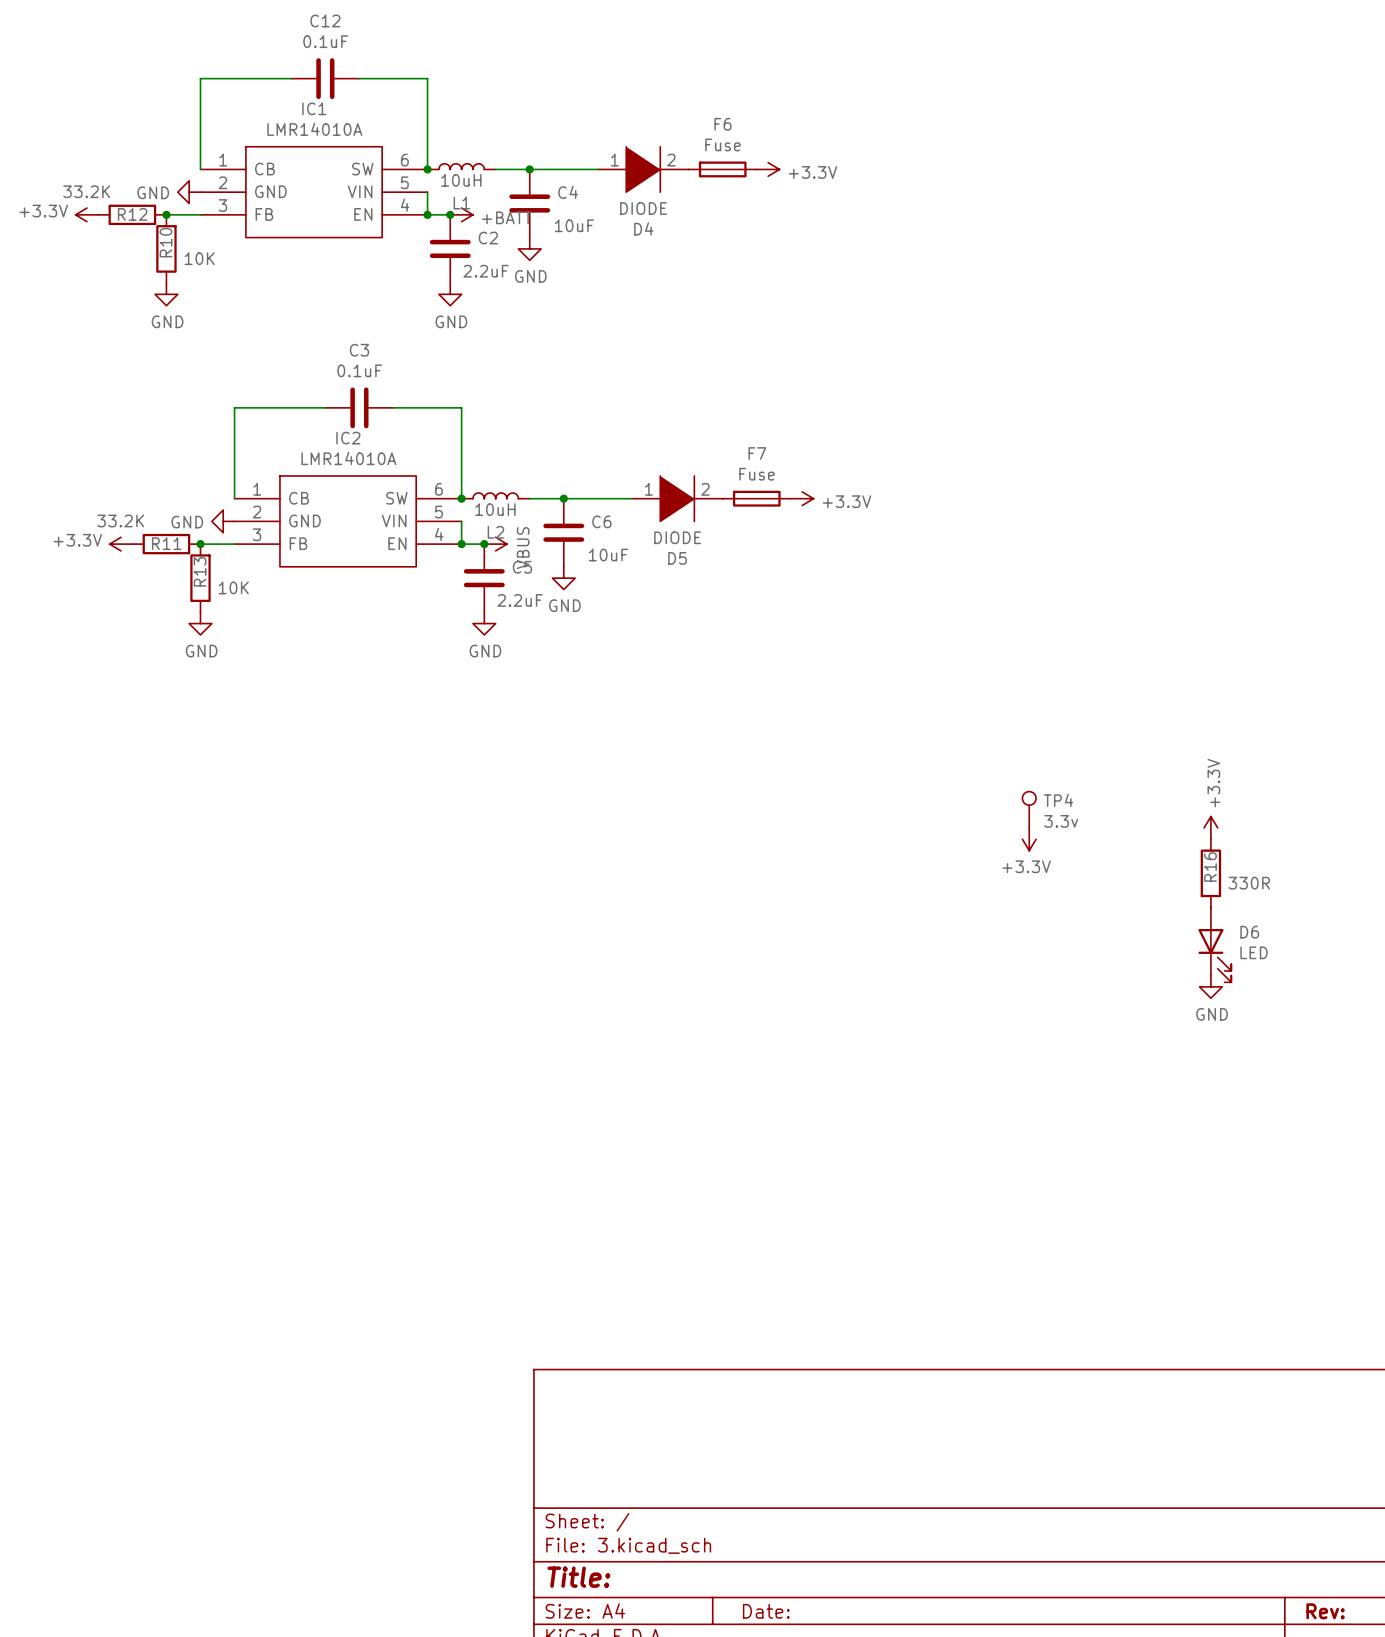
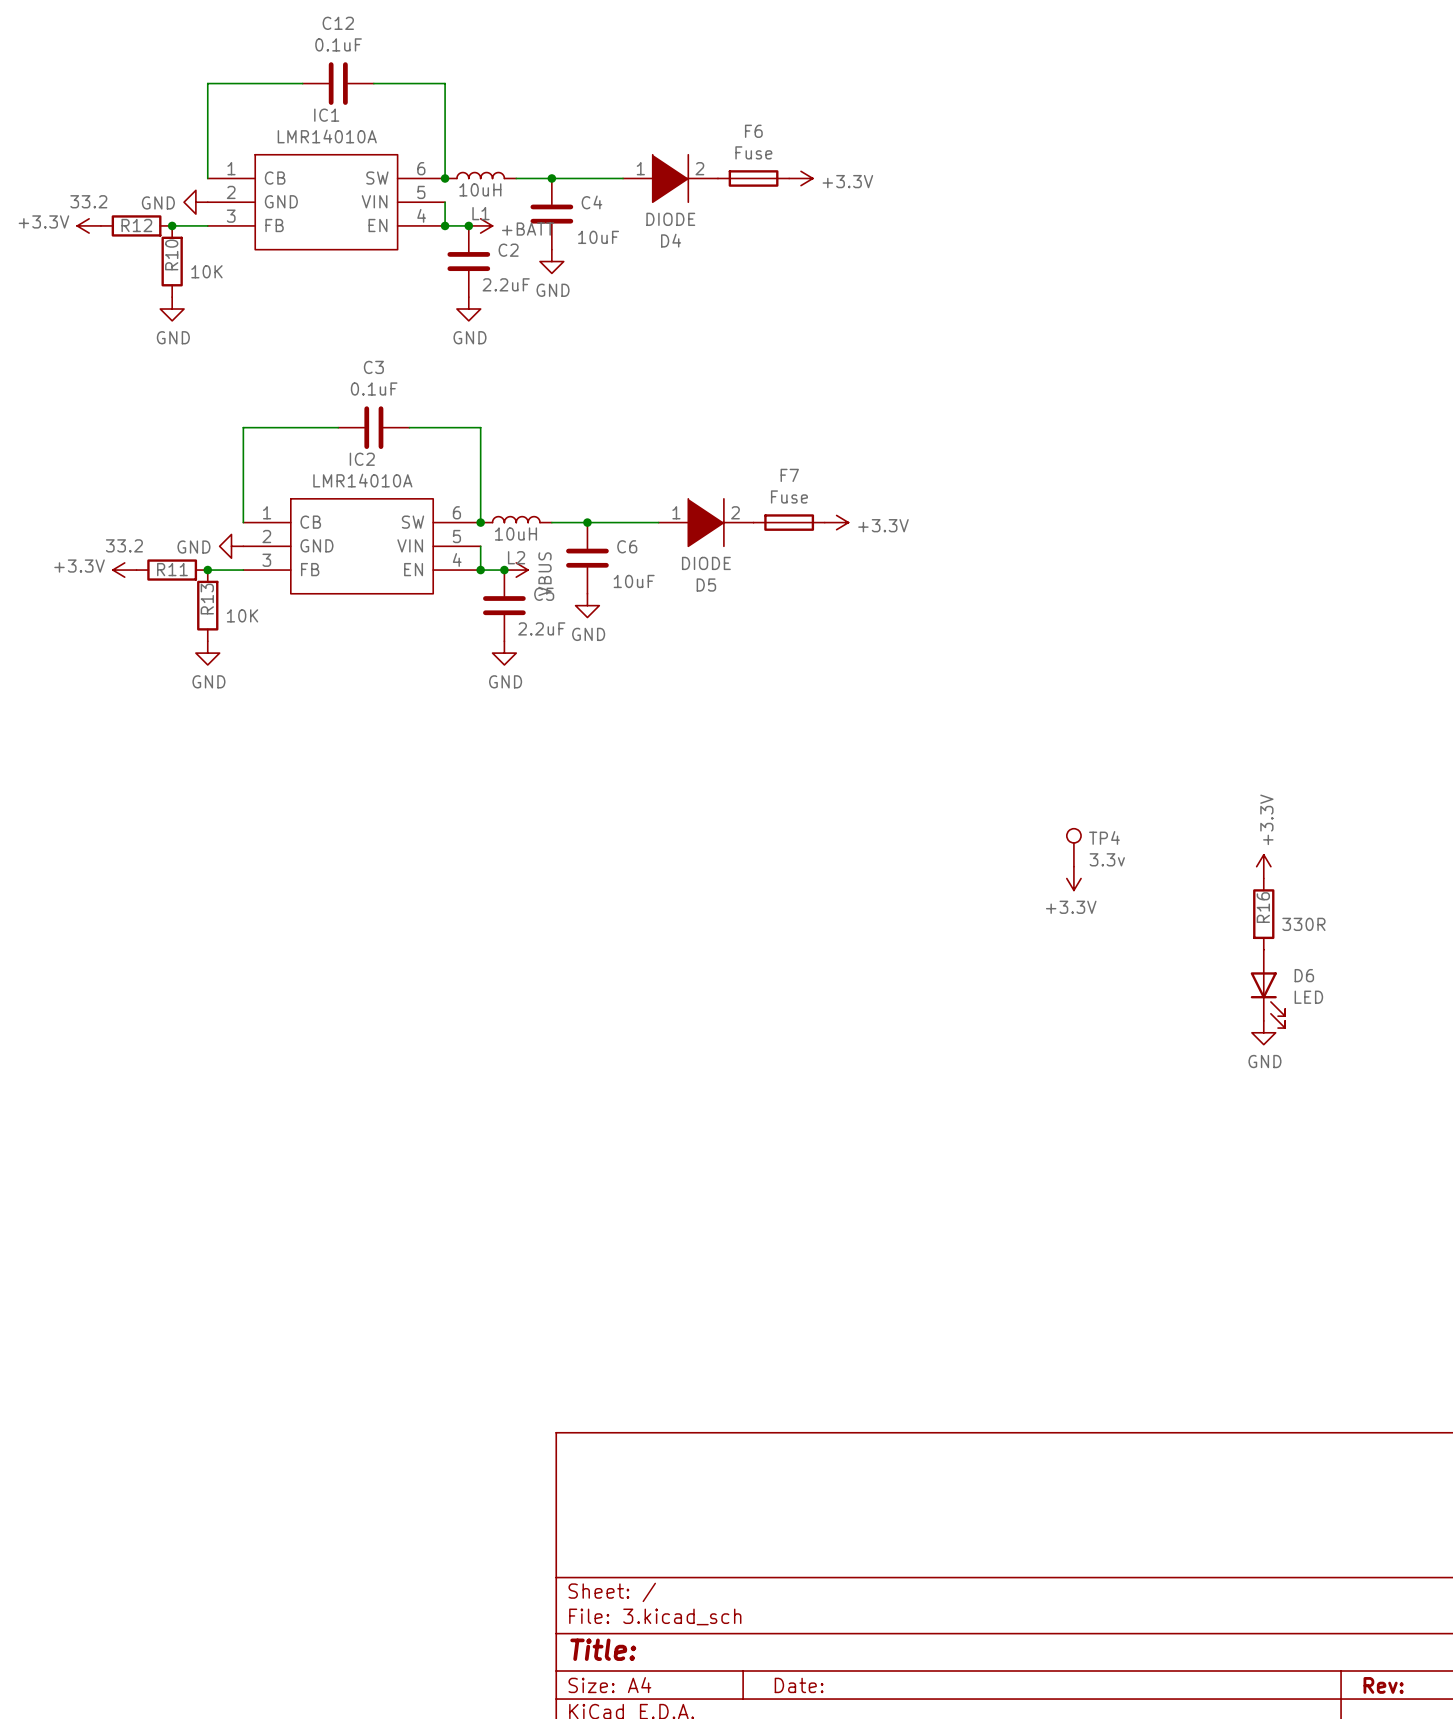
R12 value: 33.2K (86, 191) -> 33.2 (88, 201)
R11 value: 33.2K (120, 520) -> 33.2 (124, 545)

